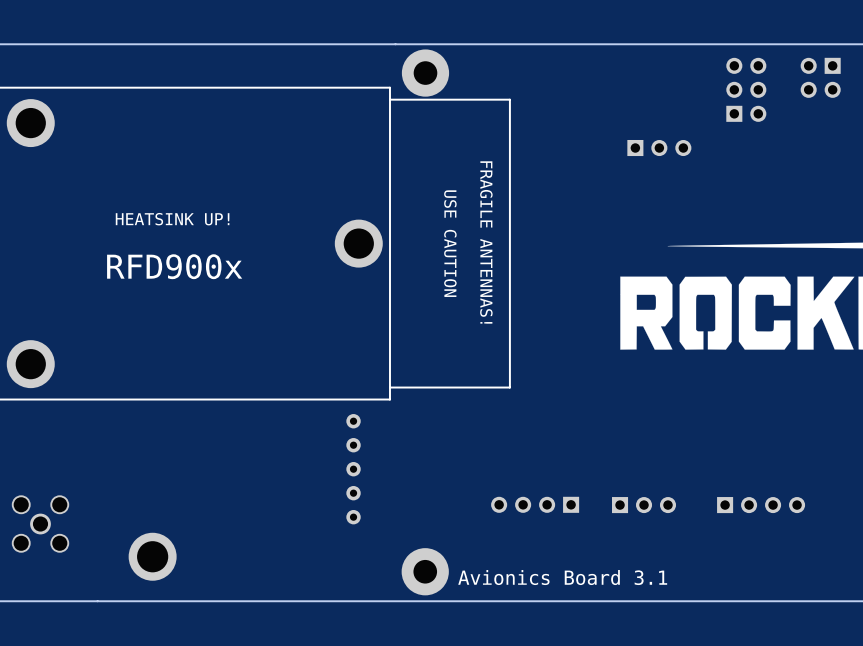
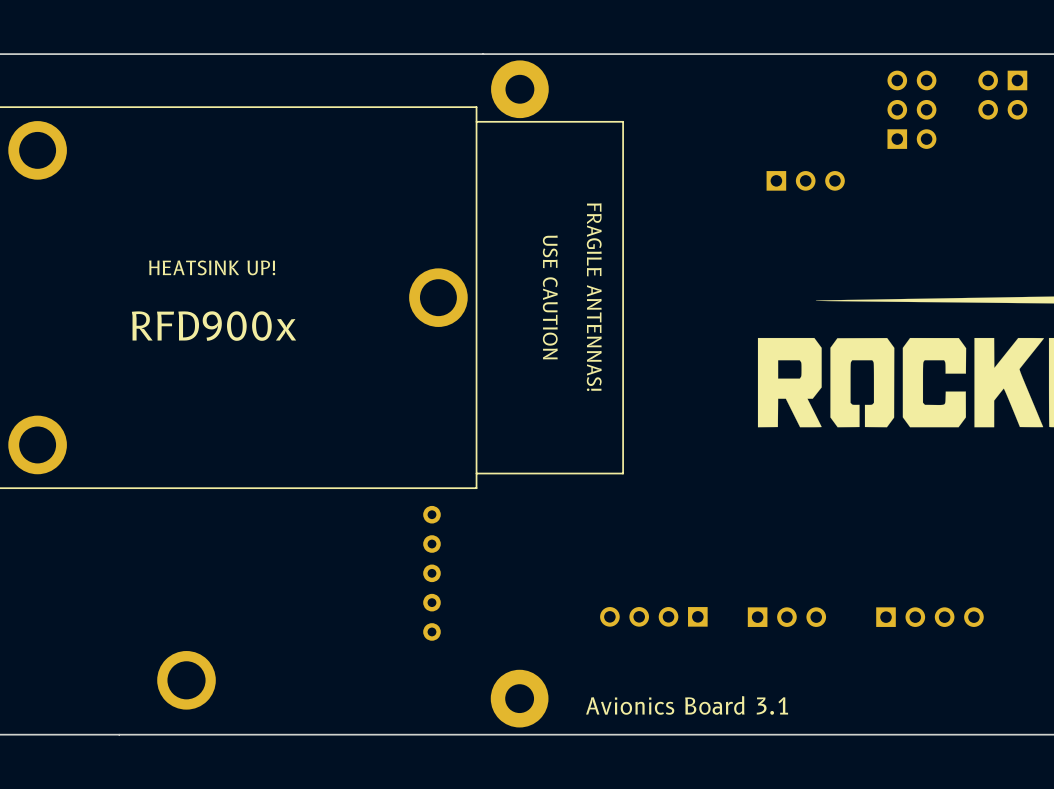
part: (40, 524) -> none

